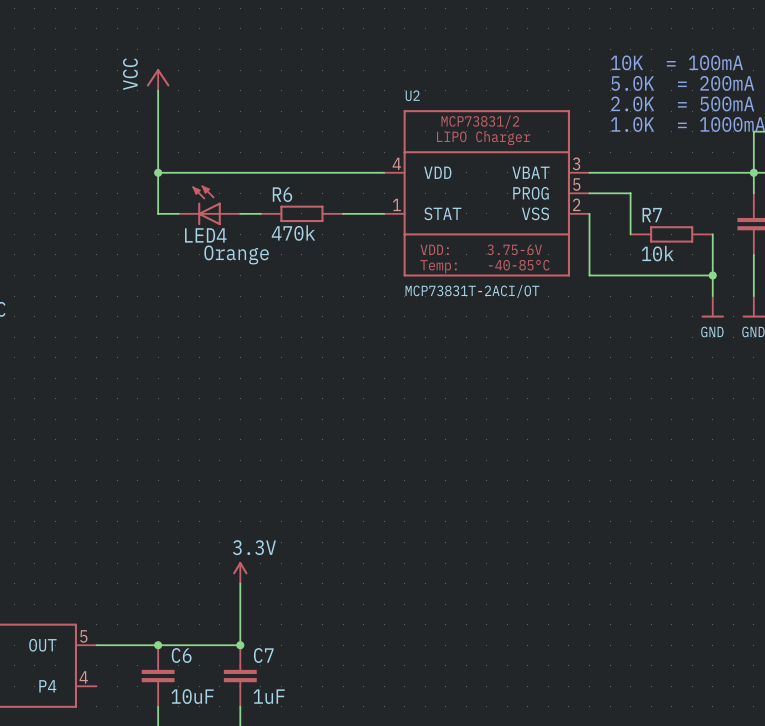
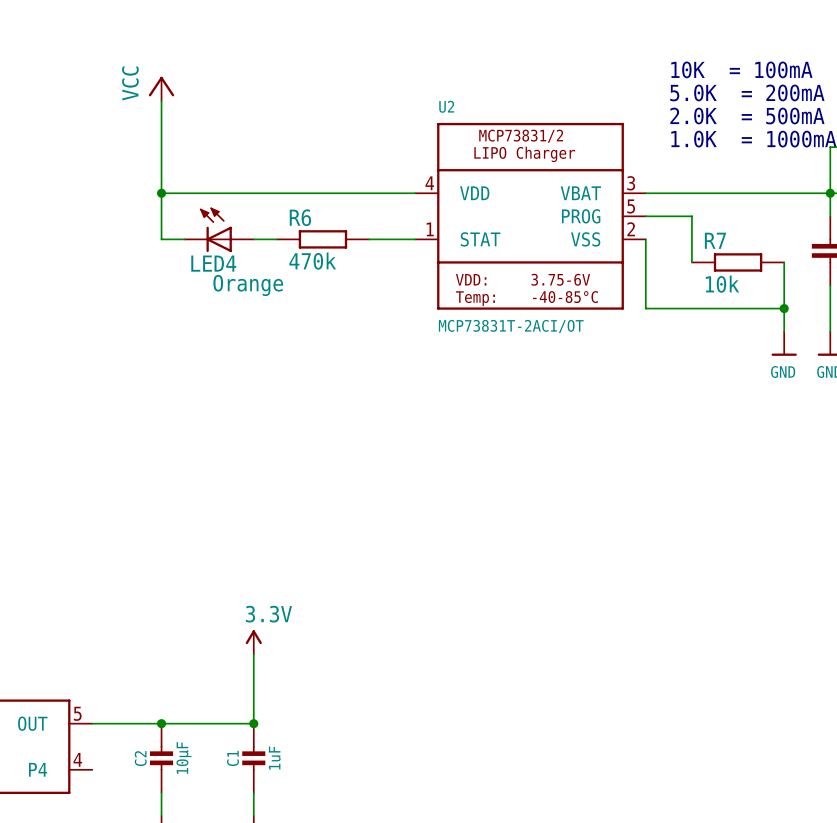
C6: 10uF (158, 676) -> none
C2: none -> 10µF (161, 758)
C7: 1uF (240, 676) -> none
C1: none -> 1uF (253, 758)

